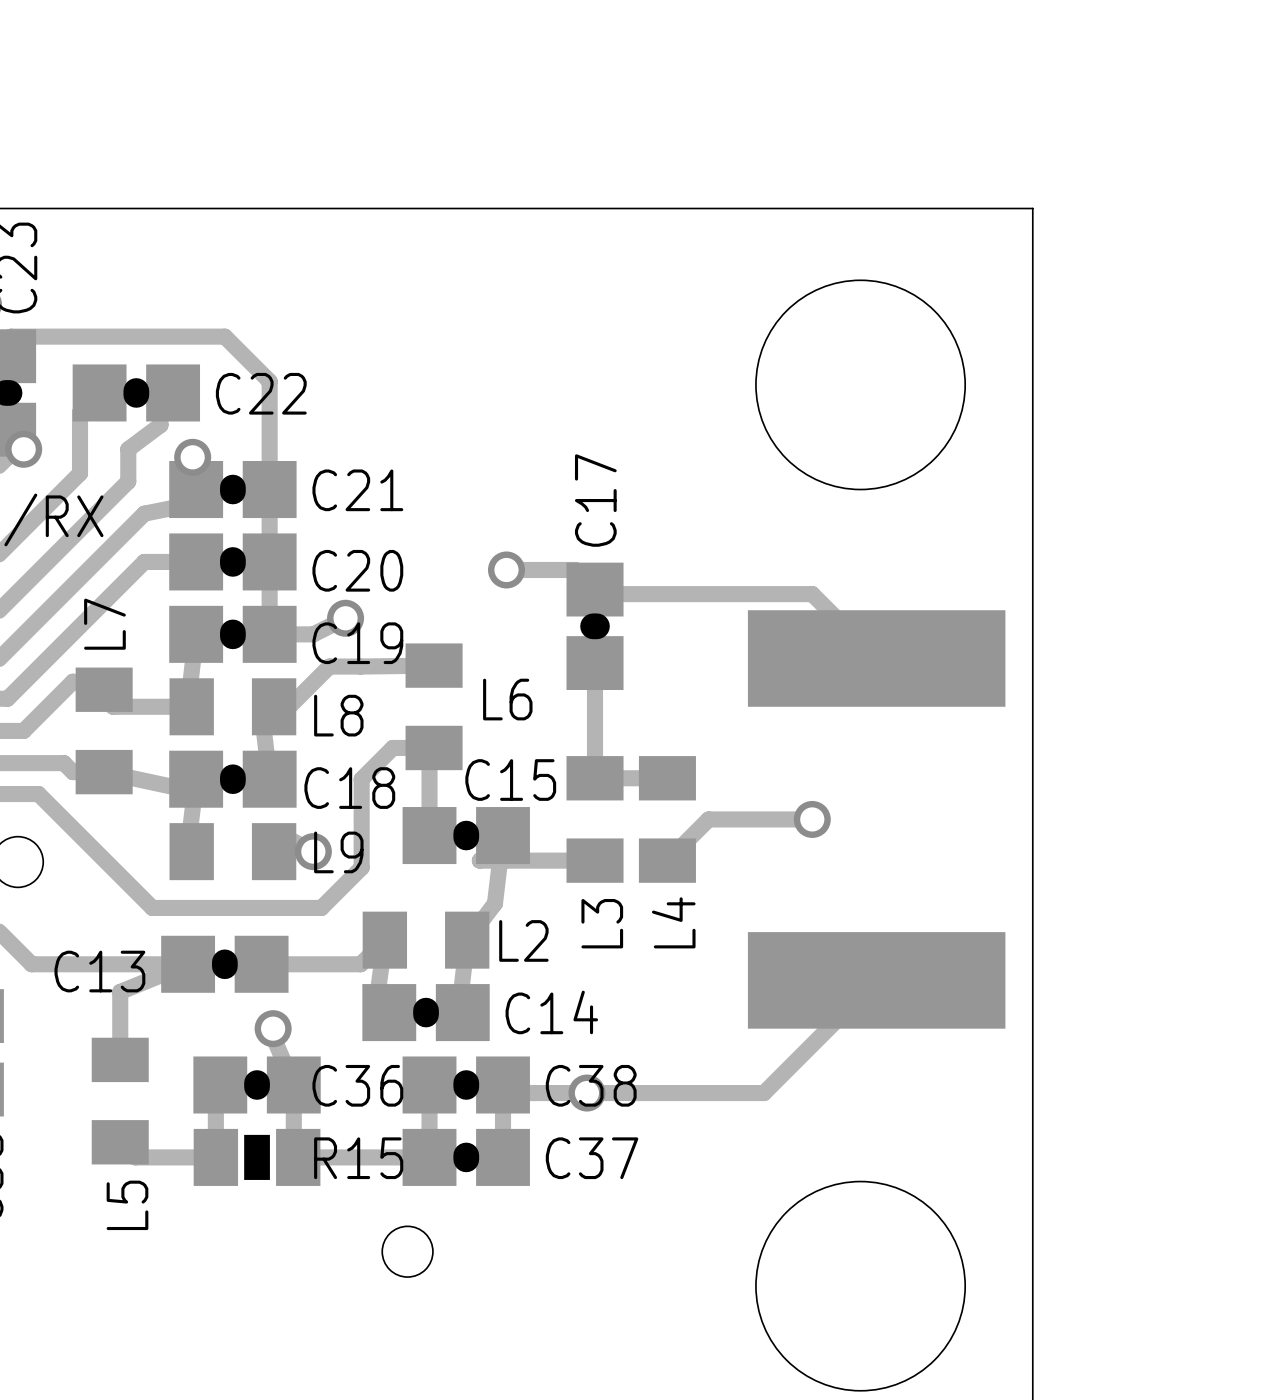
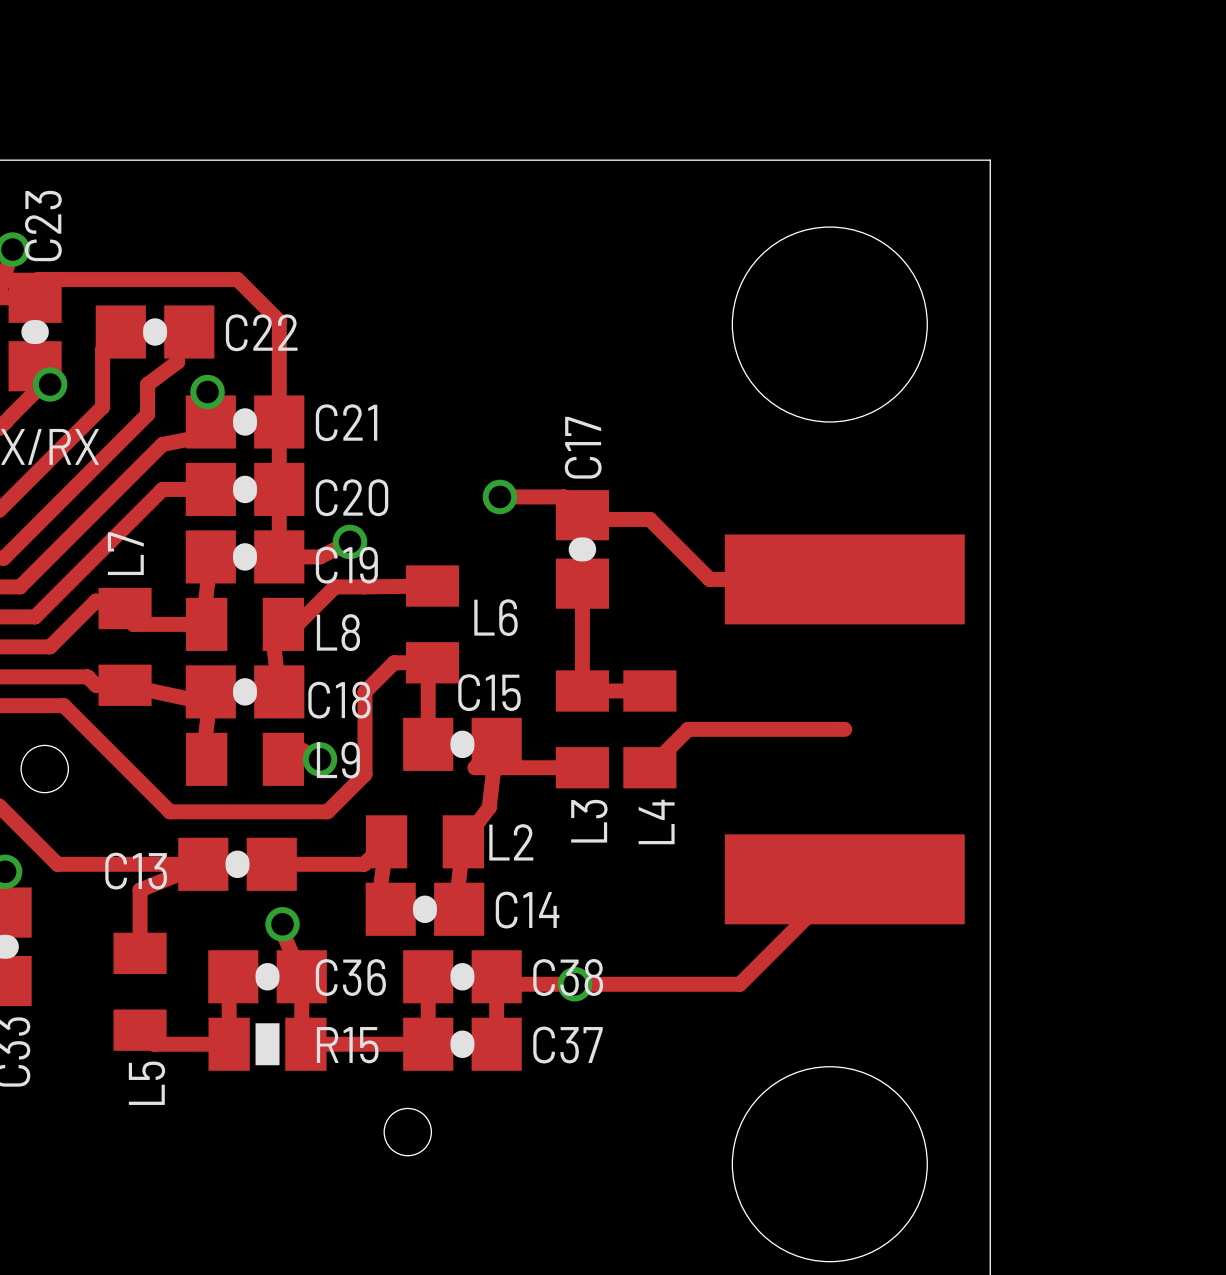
track: (667, 594) (812, 594) (876, 658) -> (649, 519) (709, 579) (844, 579)
track: none -> (784, 729) (844, 729)
via: (812, 819) -> none

